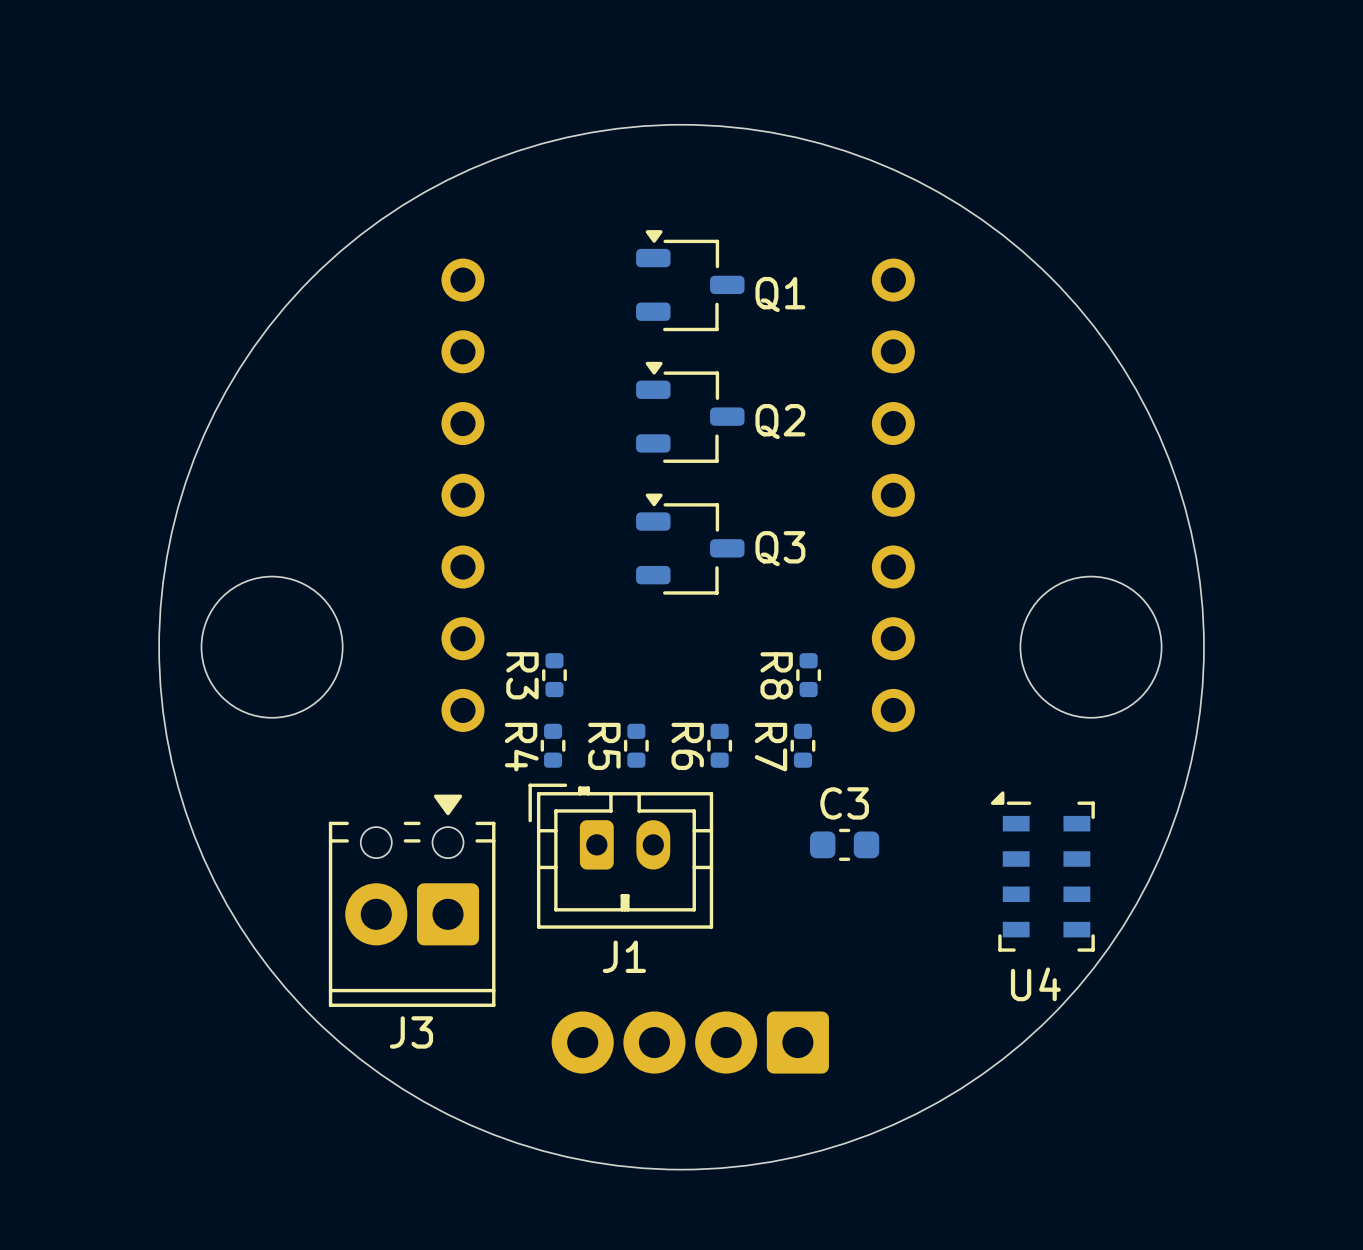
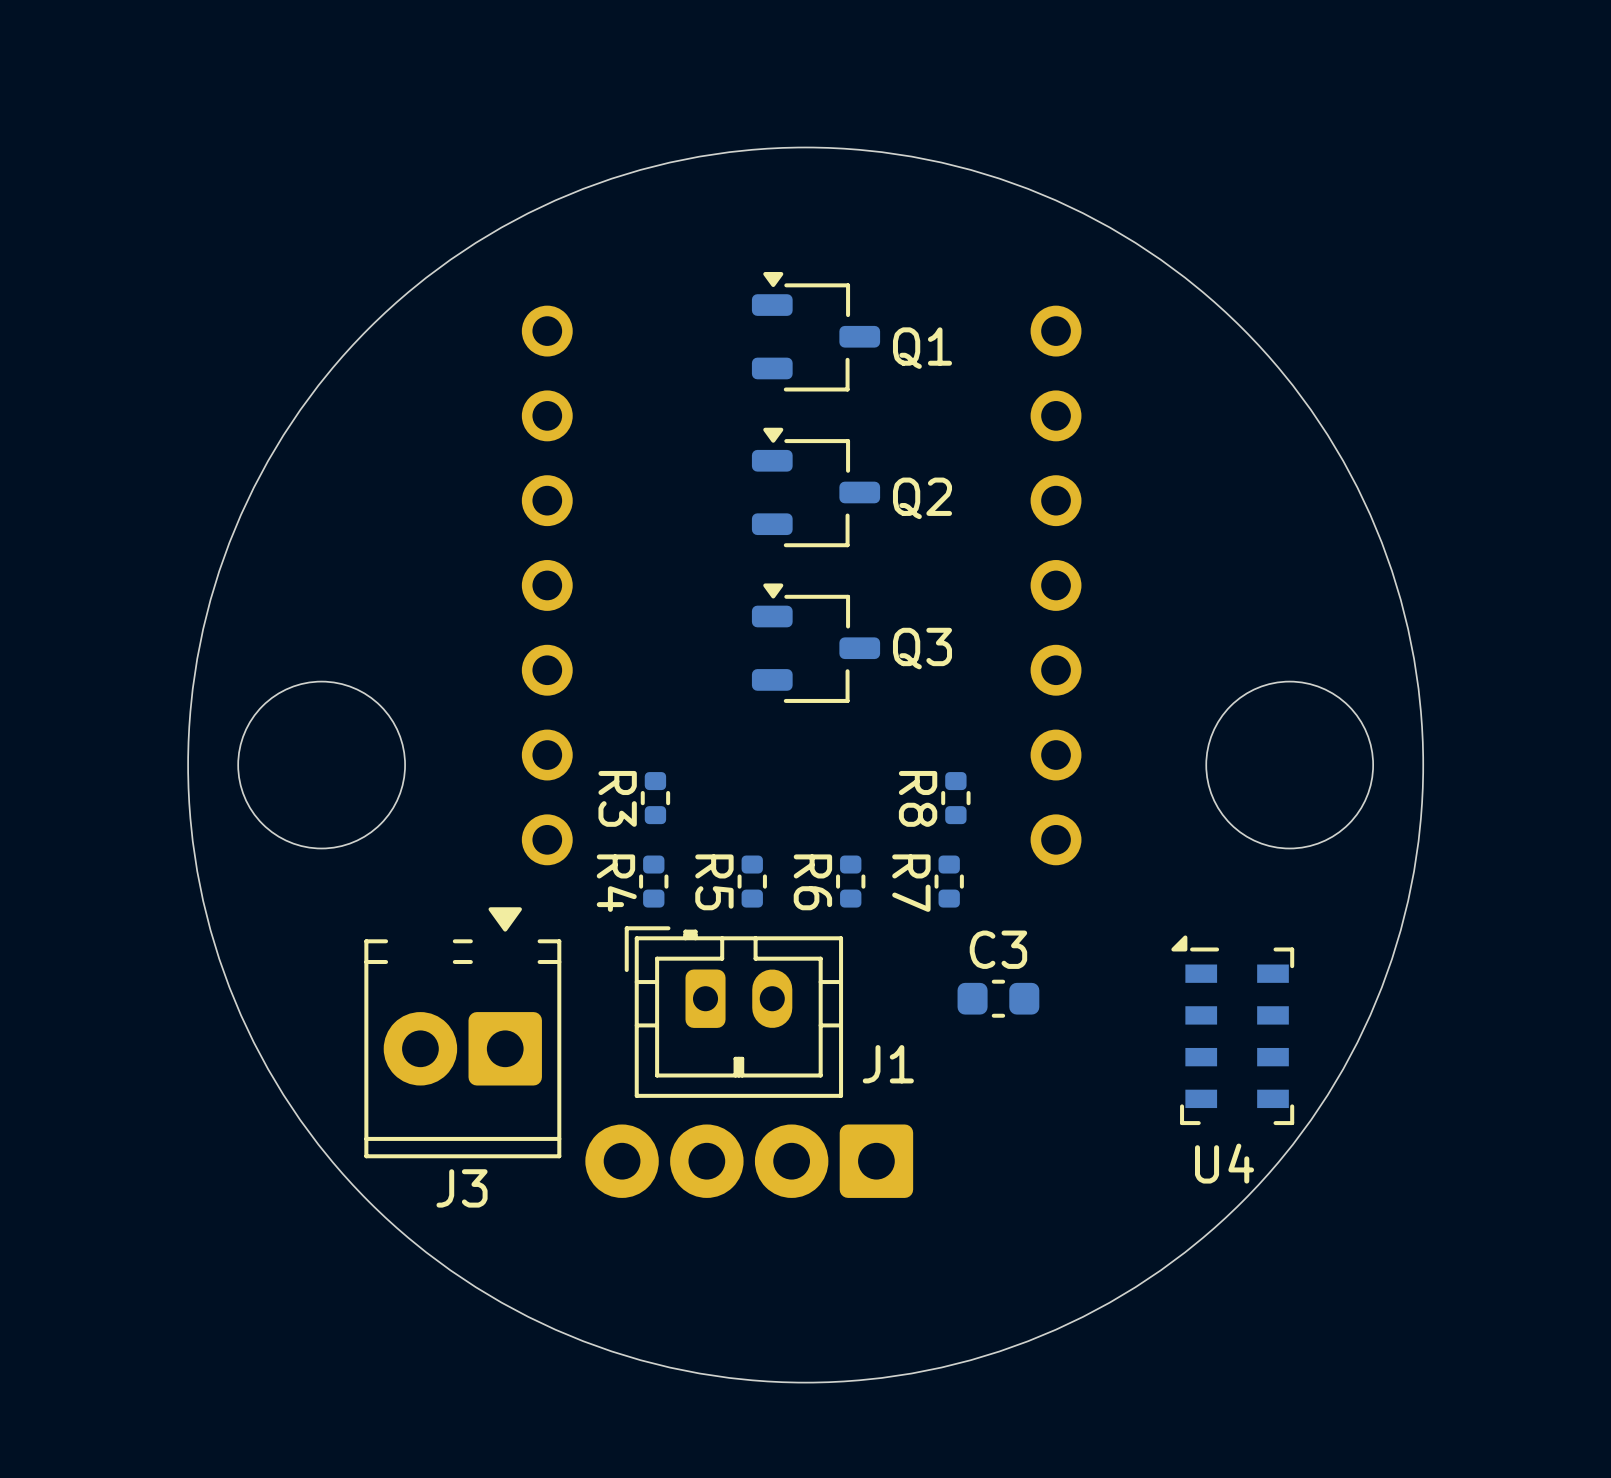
J3 footprint: [328, 794, 496, 1007] -> [364, 907, 562, 1159]
J1 name position: J1 (624, 956) -> J1 (888, 1064)
part position: (690, 1042) -> (749, 1161)

